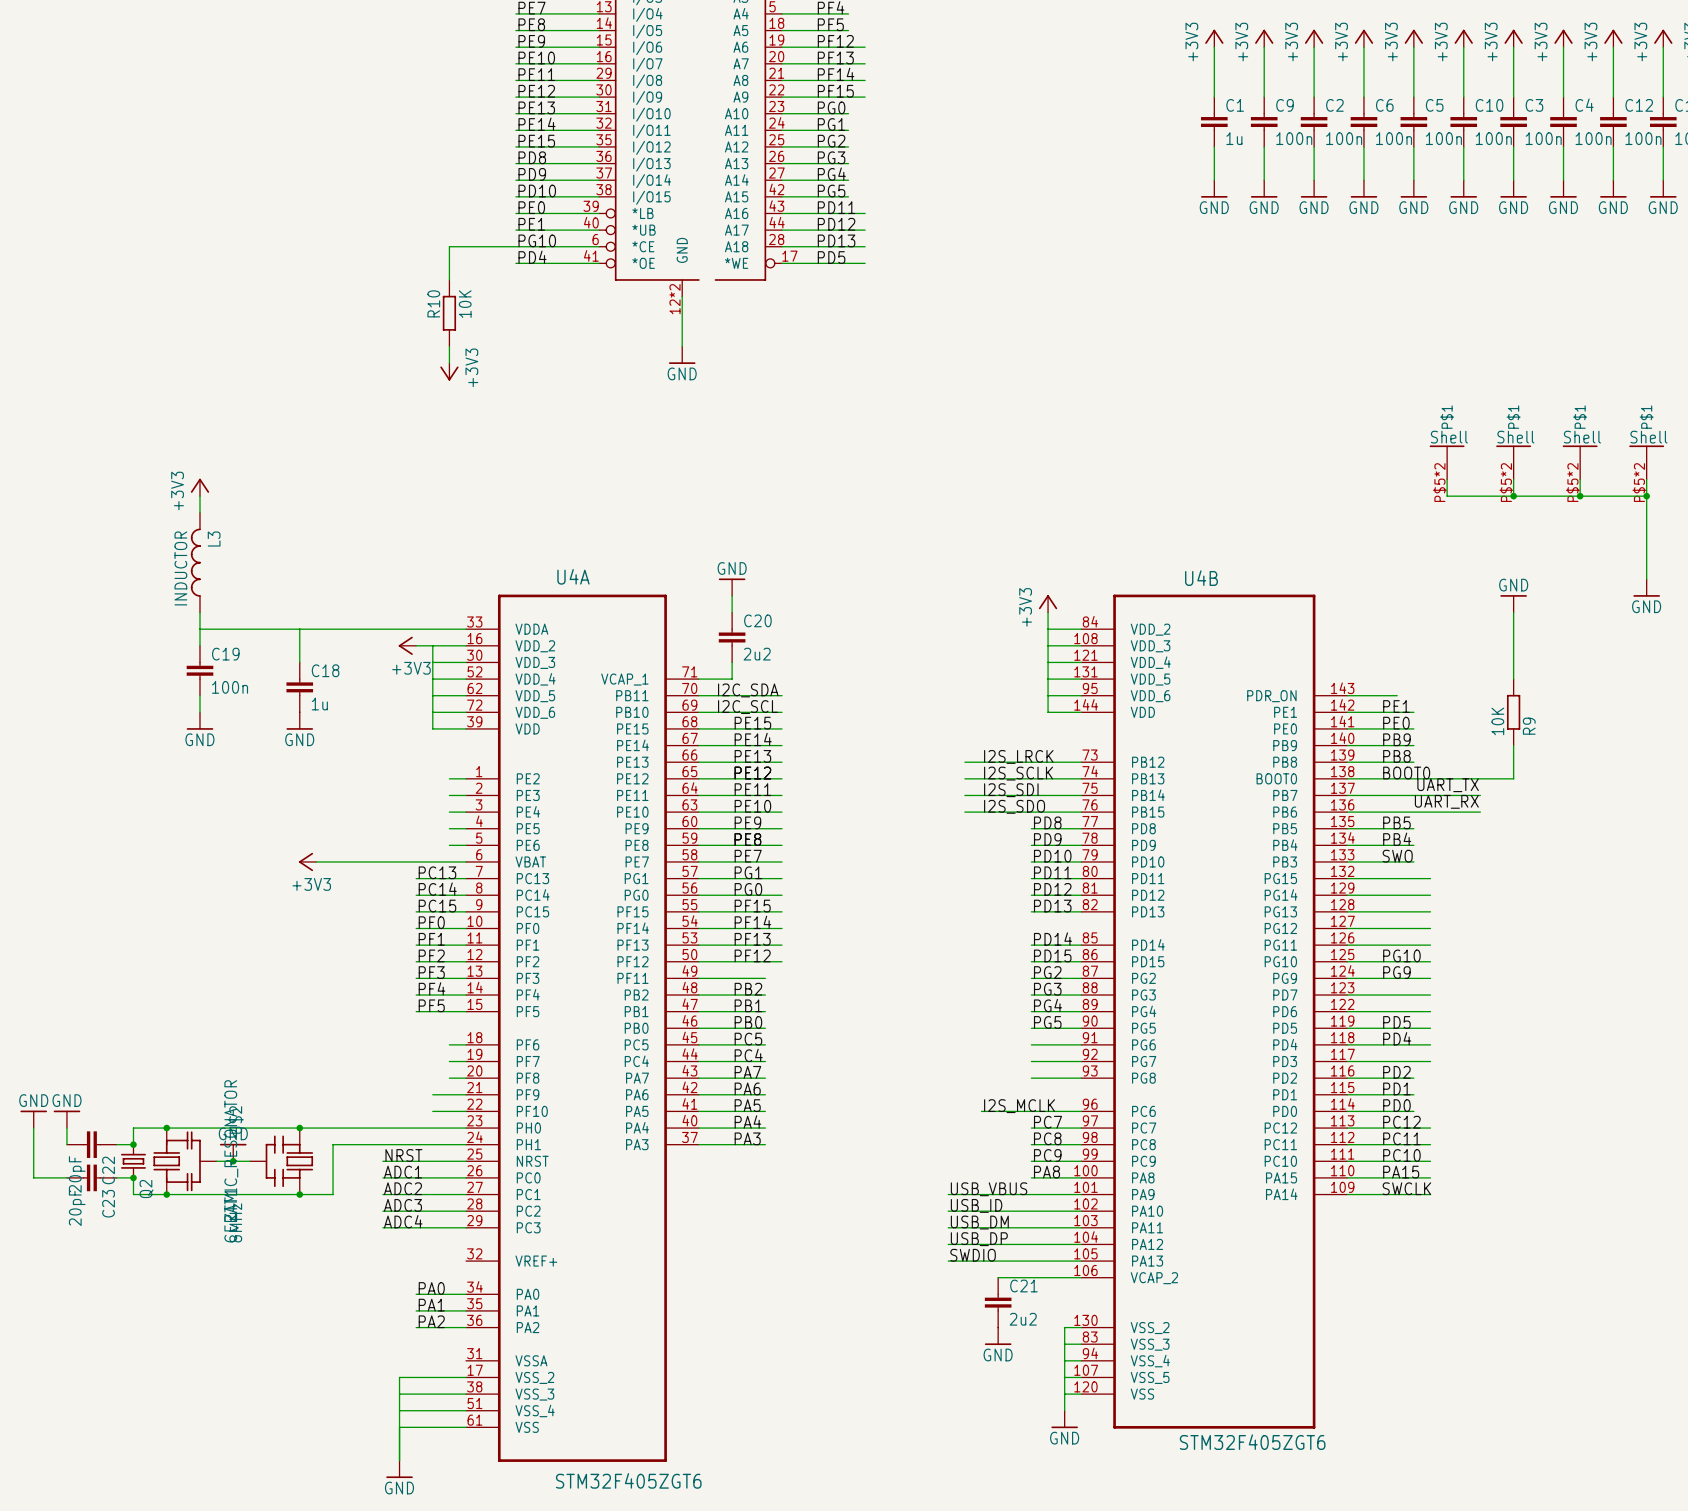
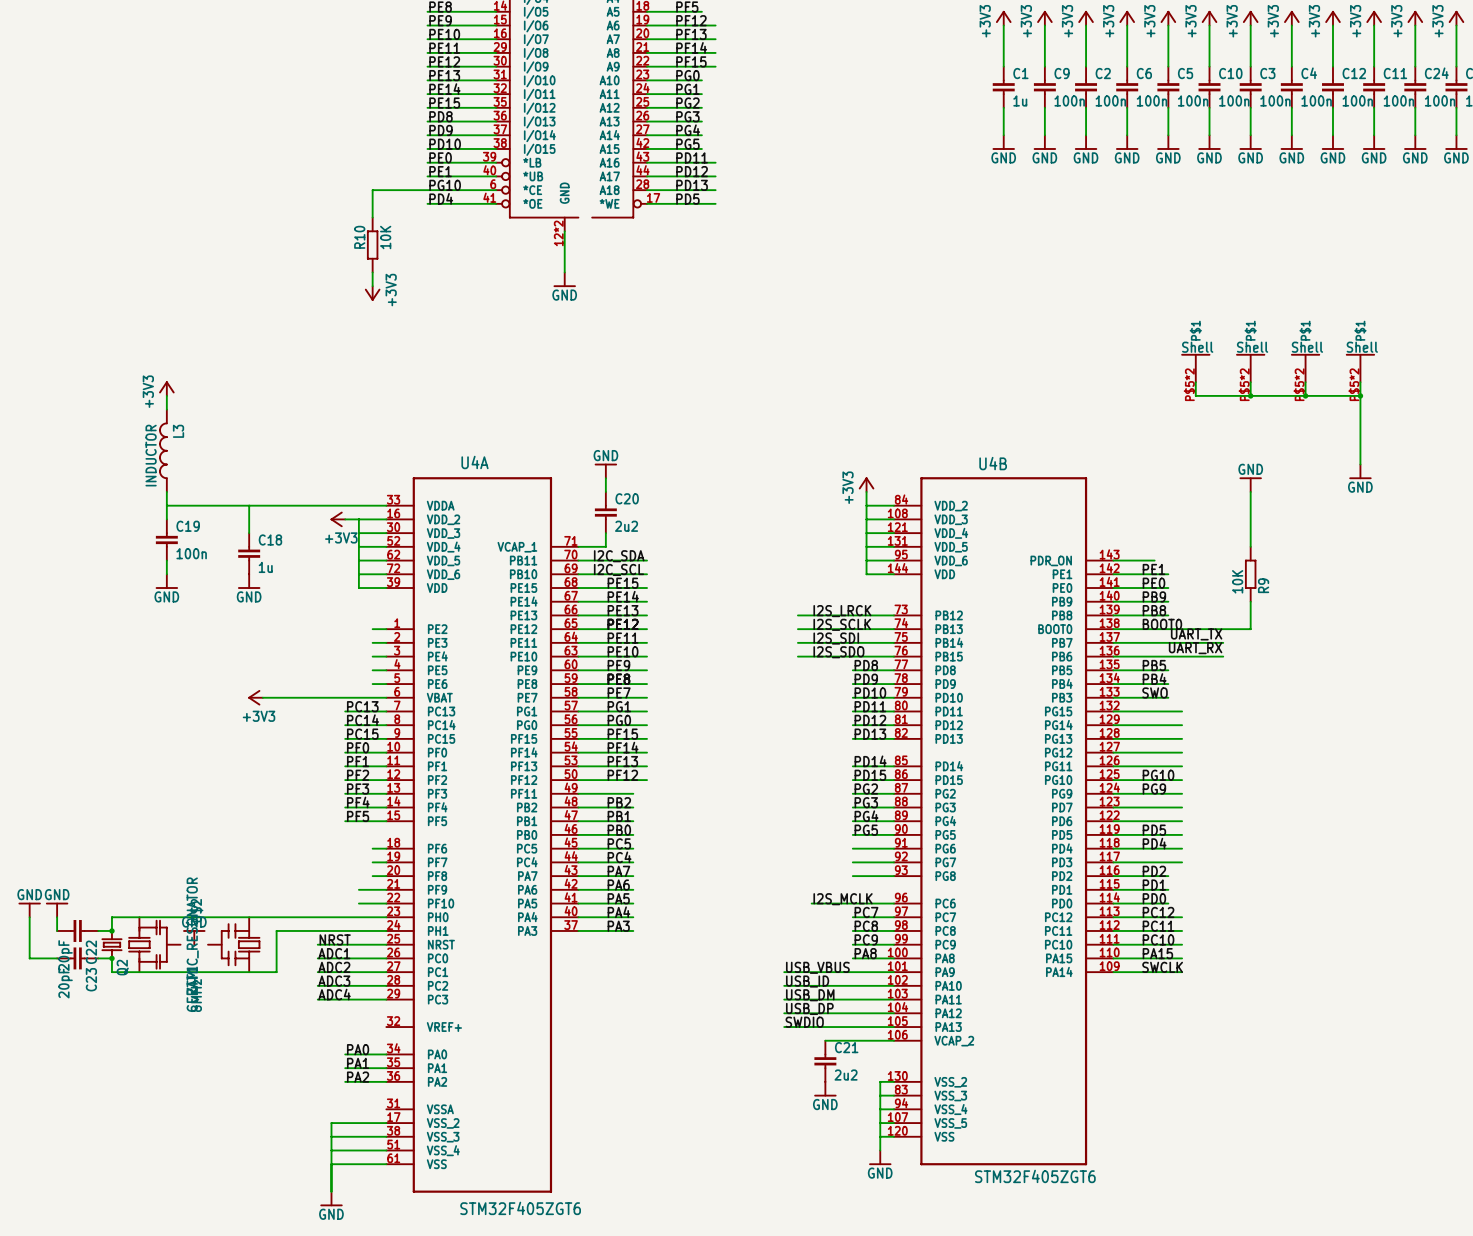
junction: (166, 1128) -> none
junction: (299, 1128) -> none
wire: (216, 1161) (249, 1161) -> none
junction: (233, 1161) -> none
junction: (166, 1194) -> none
junction: (299, 1194) -> none

